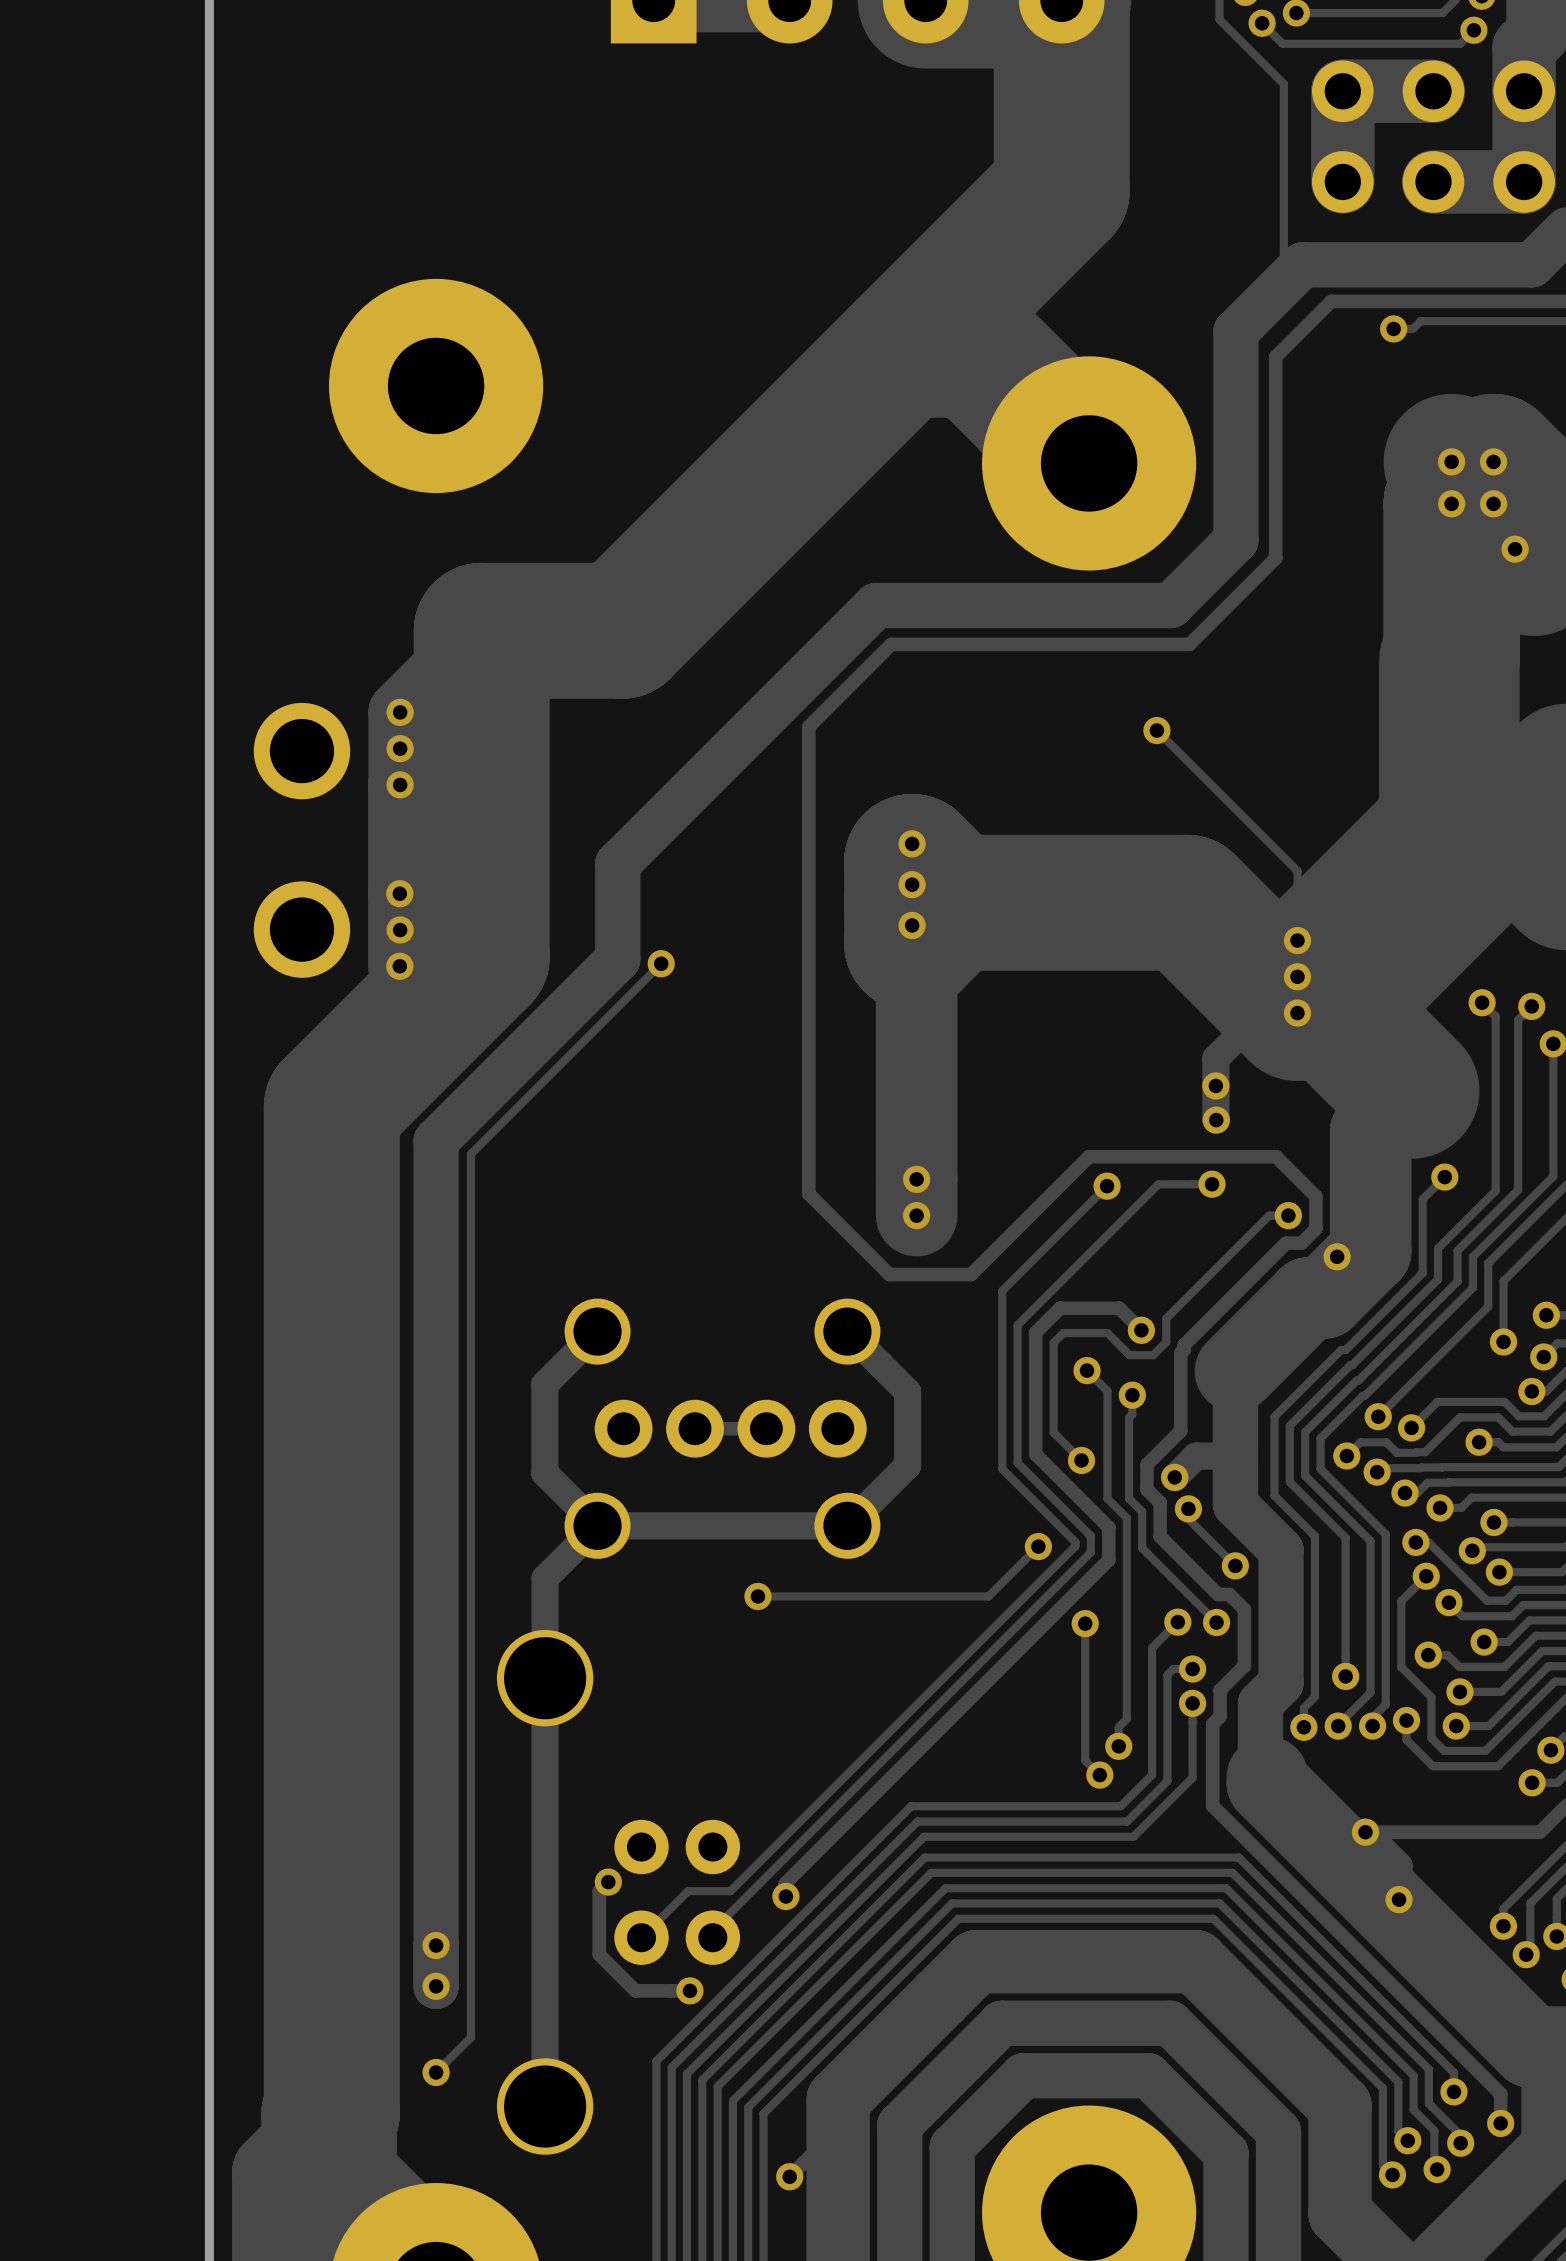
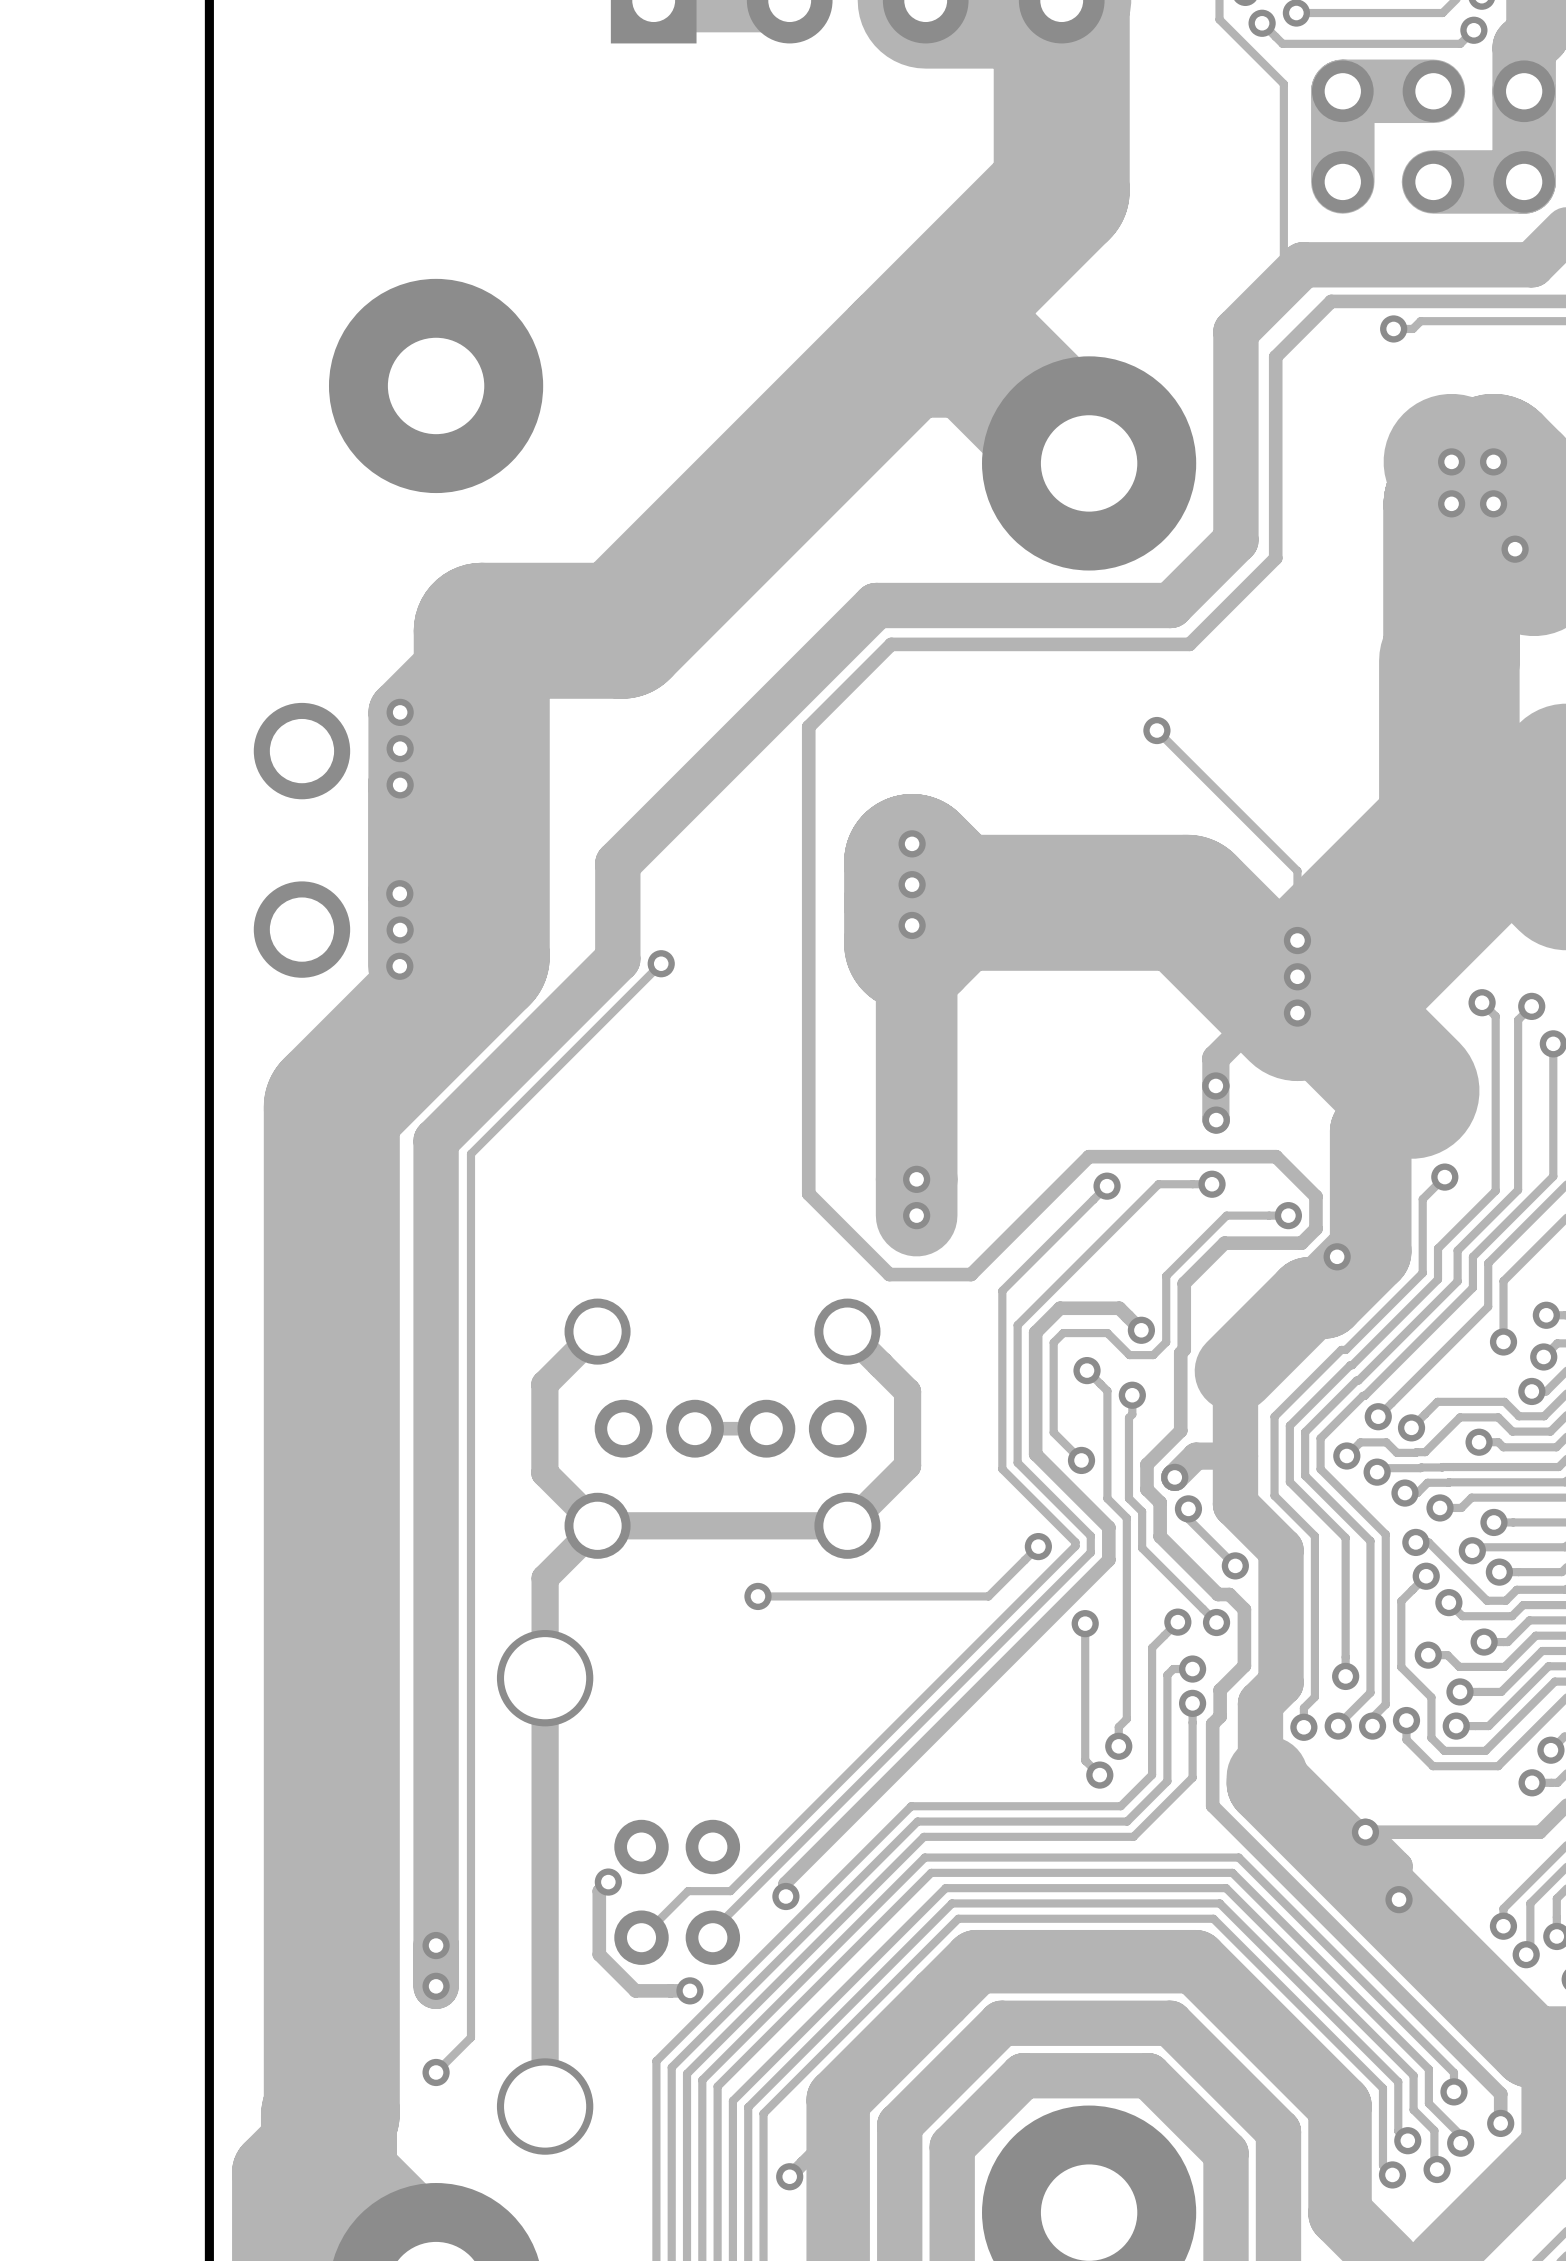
track: (1269, 1215) (1166, 1318) -> (1269, 1215) (1226, 1215) (1166, 1276) (1166, 1318)
track: (1286, 1243) (1184, 1345) -> (1286, 1243) (1224, 1243) (1184, 1283) (1184, 1345)

